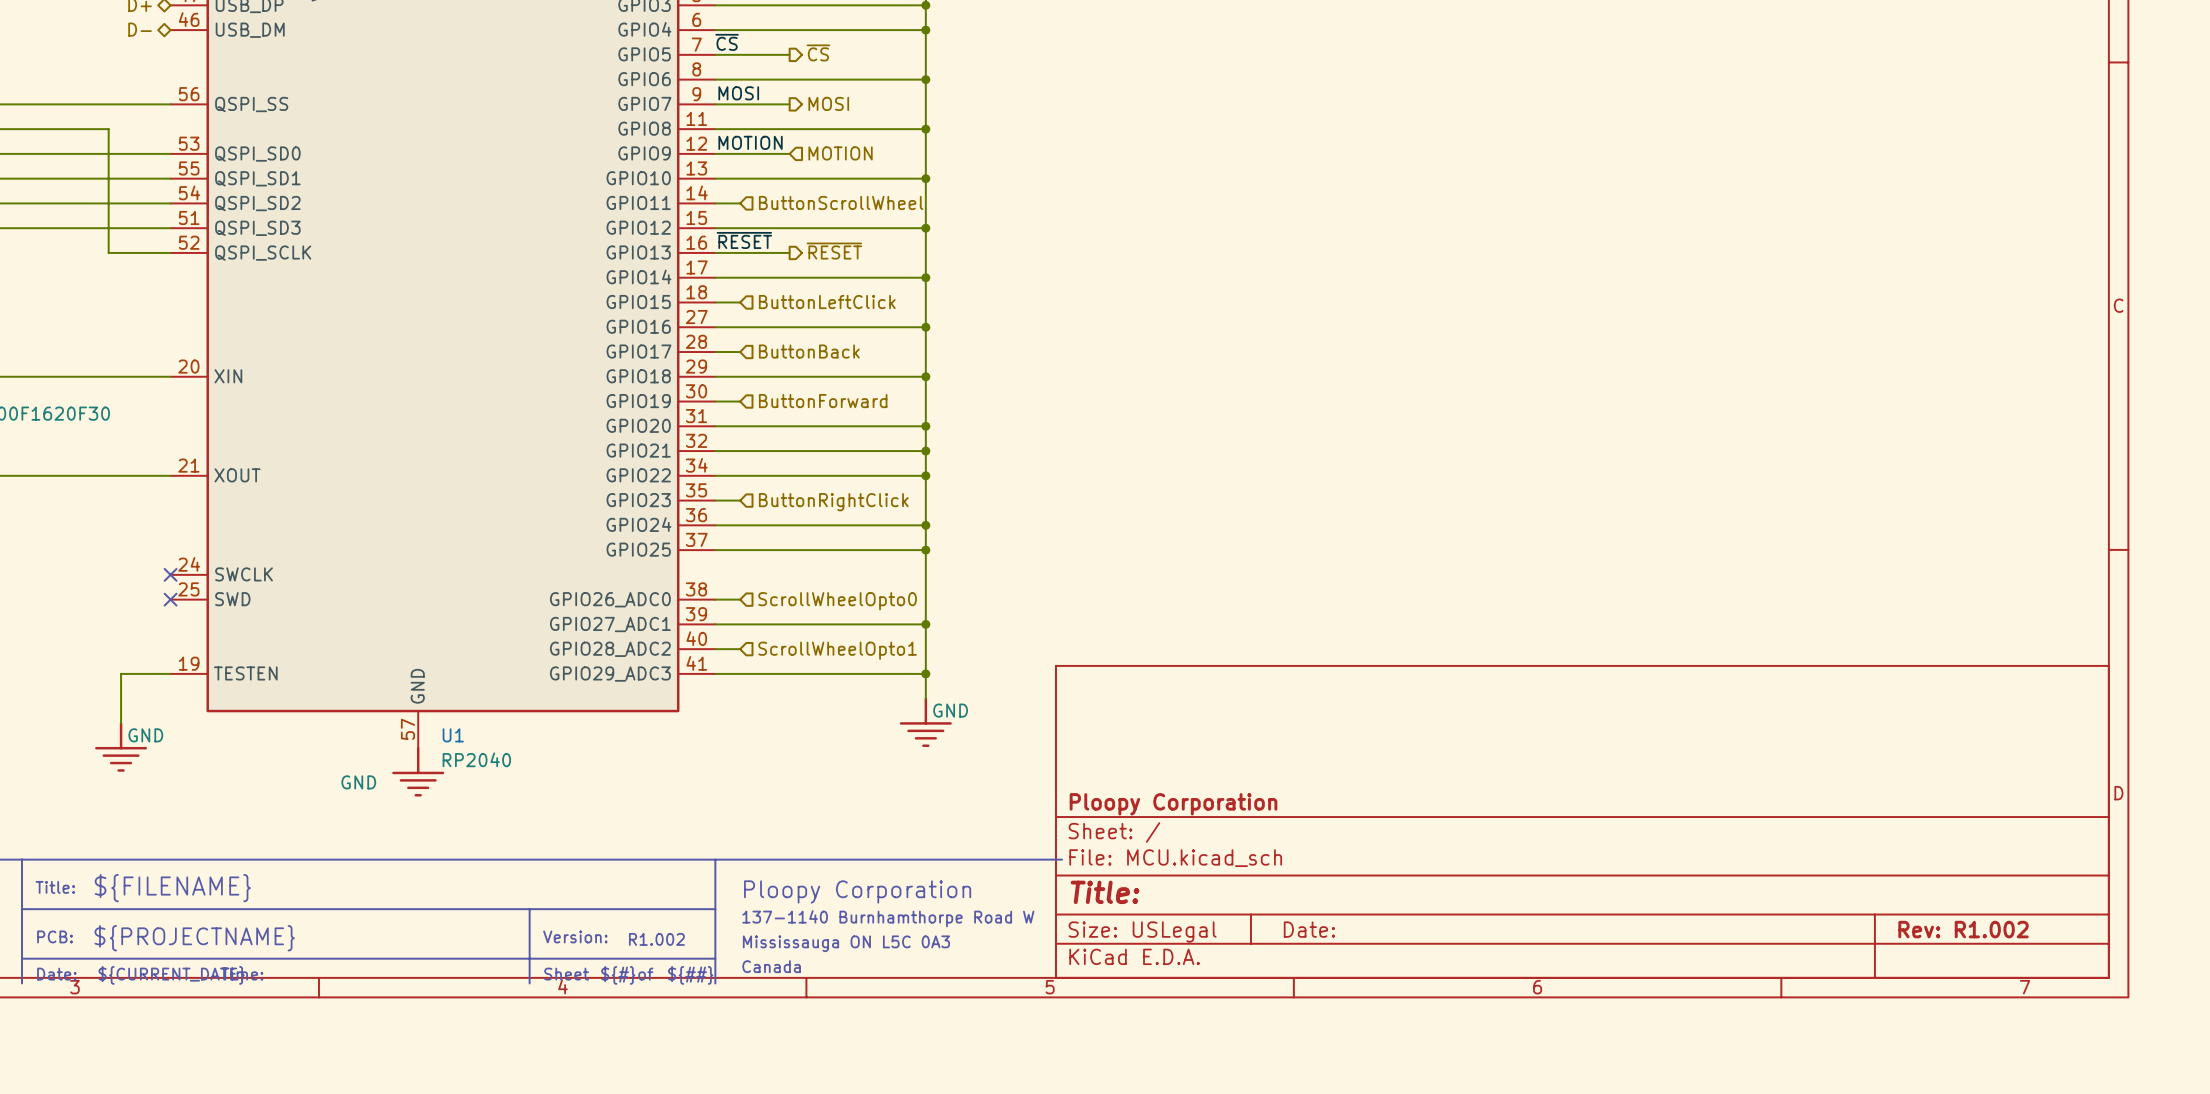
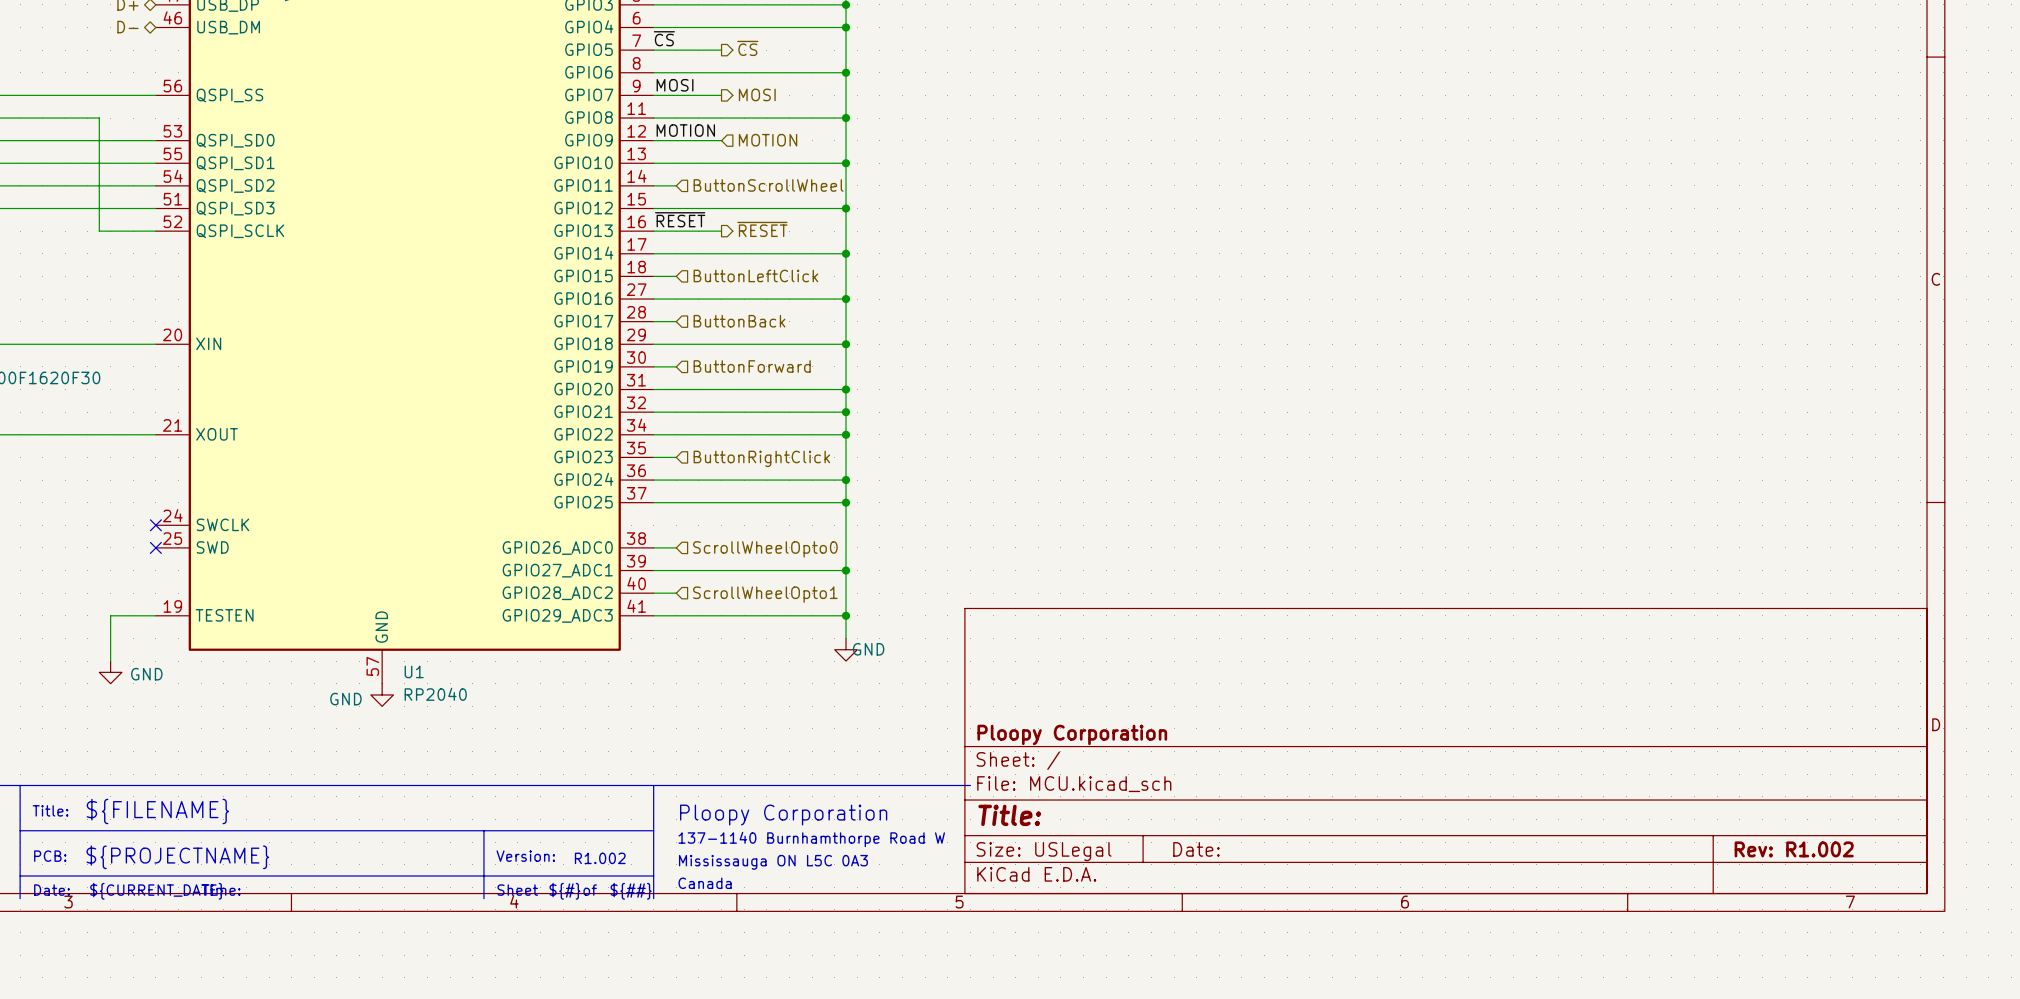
power symbol: none -> GND (845, 649)
power symbol: GND (925, 722) -> none
power symbol: none -> GND (110, 672)
power symbol: GND (121, 746) -> none
power symbol: none -> GND (382, 694)
power symbol: GND (418, 771) -> none

